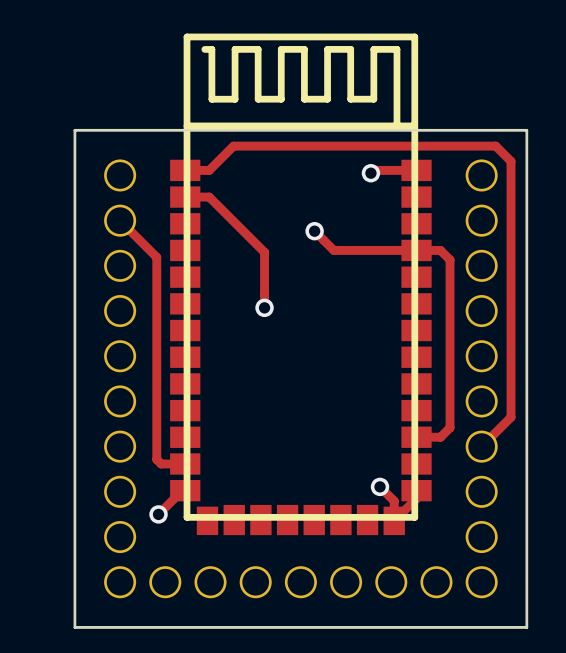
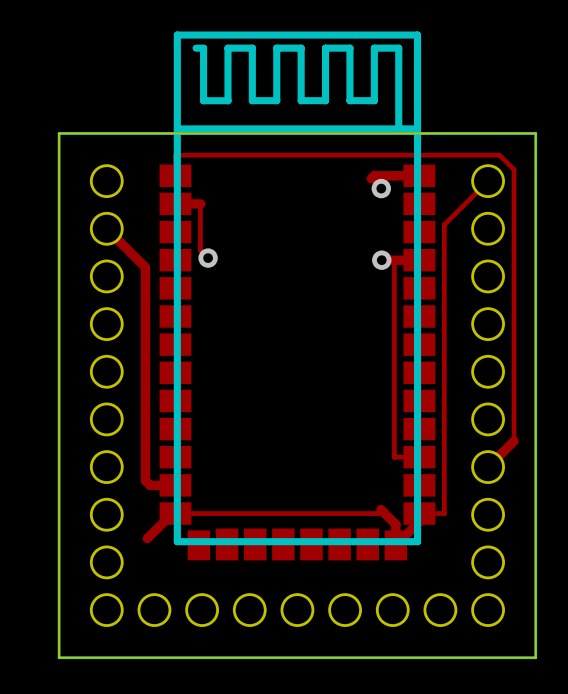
track: (185, 170) (209, 170) (233, 146) (495, 146) (511, 161) (511, 417) (506, 421) -> (175, 175) (175, 155) (499, 155) (514, 169) (514, 441)
via position: (370, 173) -> (381, 188)
track: none -> (488, 181) (444, 224) (444, 513) (423, 513)
track: (209, 197) (264, 252) (264, 307) -> (200, 203) (200, 250) (208, 258)
track: (314, 231) (333, 250) (380, 250) -> none
via: (314, 231) -> none
via: none -> (208, 258)
via: none -> (381, 260)
track: (416, 250) (440, 250) (450, 259) (450, 427) (440, 437) (416, 437) -> (394, 260) (394, 457) (419, 457)
via: (264, 307) -> none
via: (380, 486) -> none
track: none -> (175, 513) (386, 513) (395, 523)
via: (158, 514) -> none

